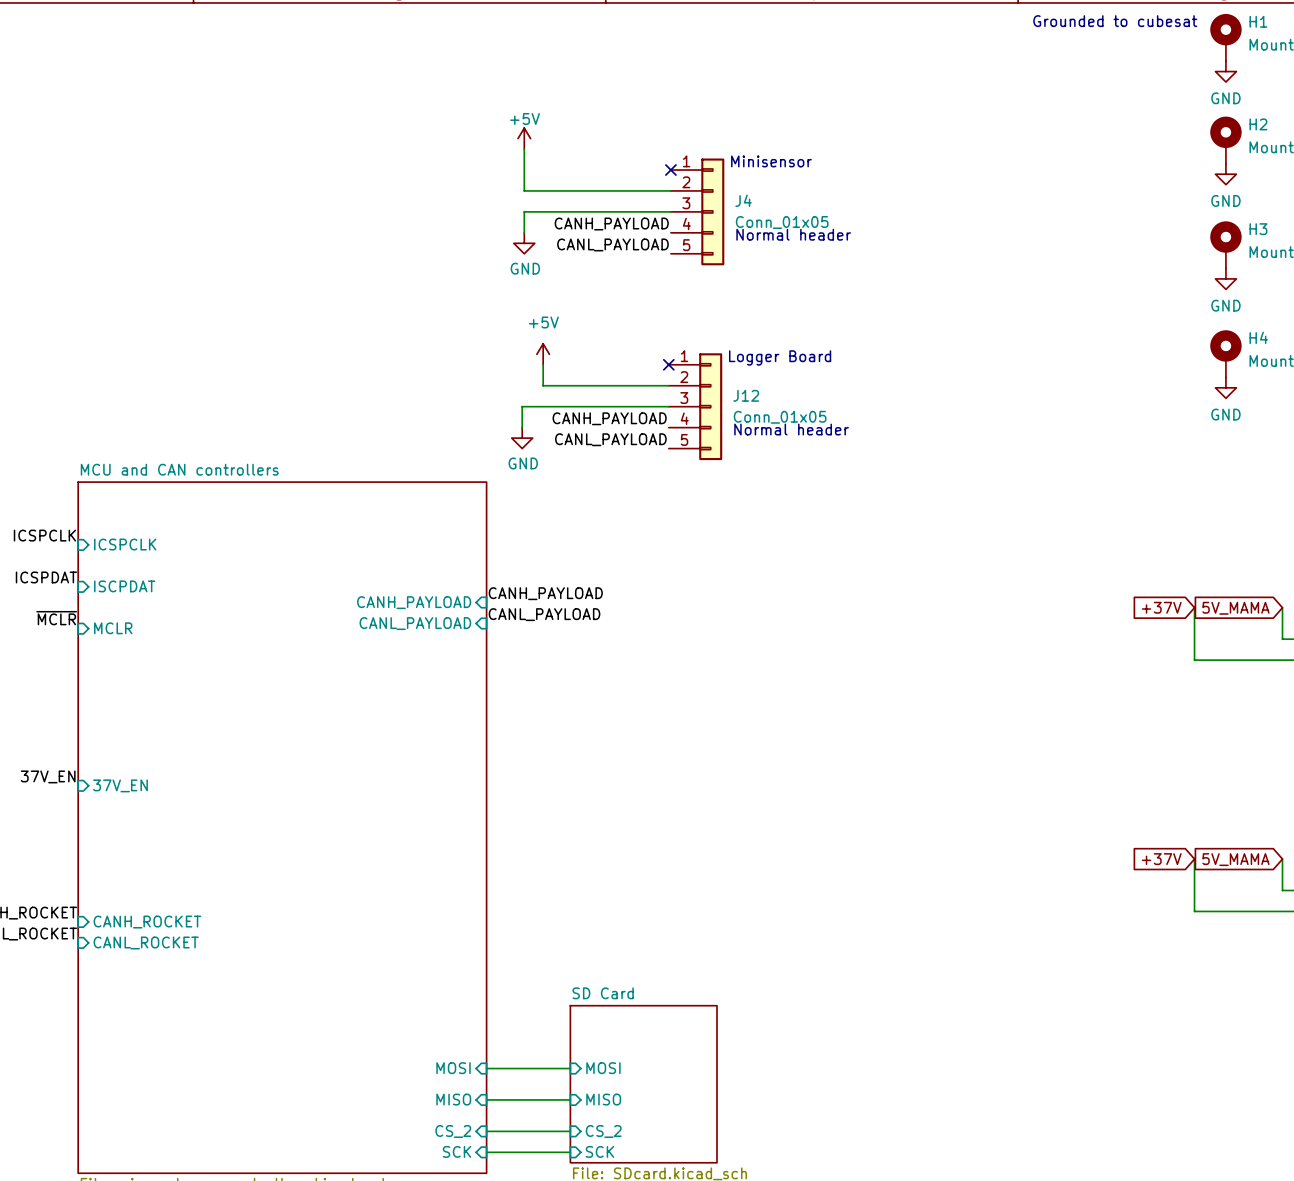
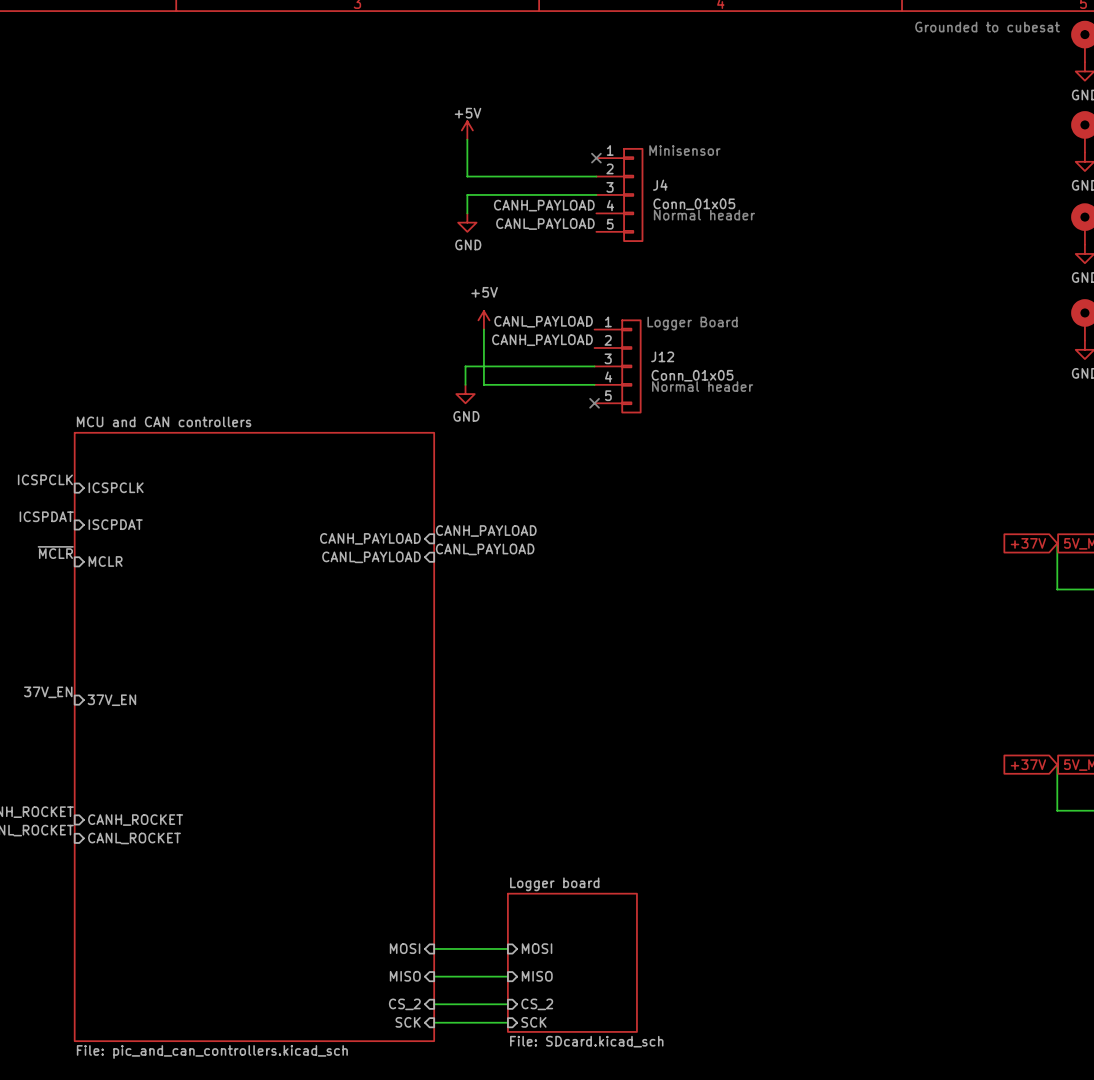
no-connect mark: (668, 364) -> none
wire: (543, 385) (668, 385) -> (483, 347) (483, 384) (594, 384)
label position: CANH_PAYLOAD (609, 418) -> CANH_PAYLOAD (542, 340)
label position: CANL_PAYLOAD (610, 439) -> CANL_PAYLOAD (543, 321)
no-connect mark: none -> (594, 403)
sheet SD Card name: SD Card (603, 993) -> Logger board (554, 884)

